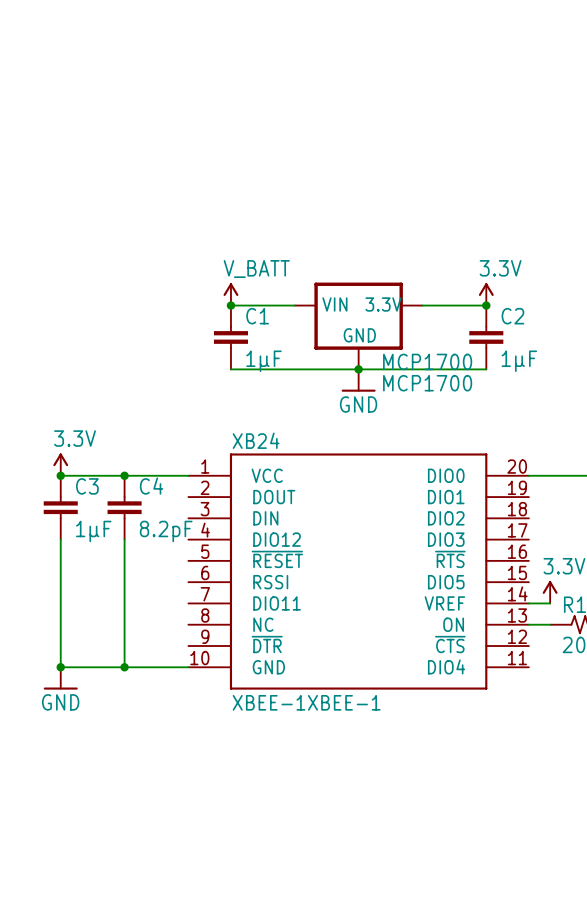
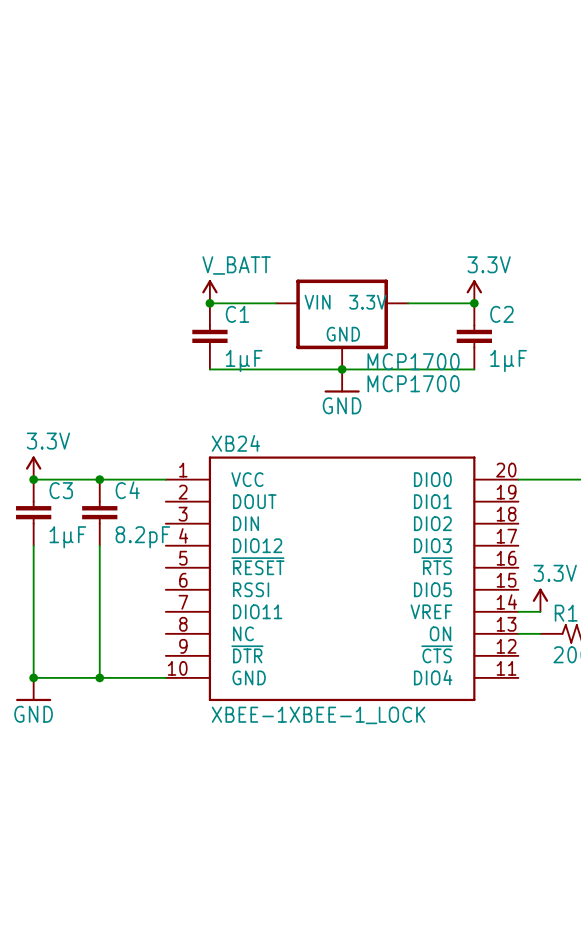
XB24 value: XBEE-1XBEE-1 (306, 702) -> XBEE-1XBEE-1_LOCK (318, 715)

